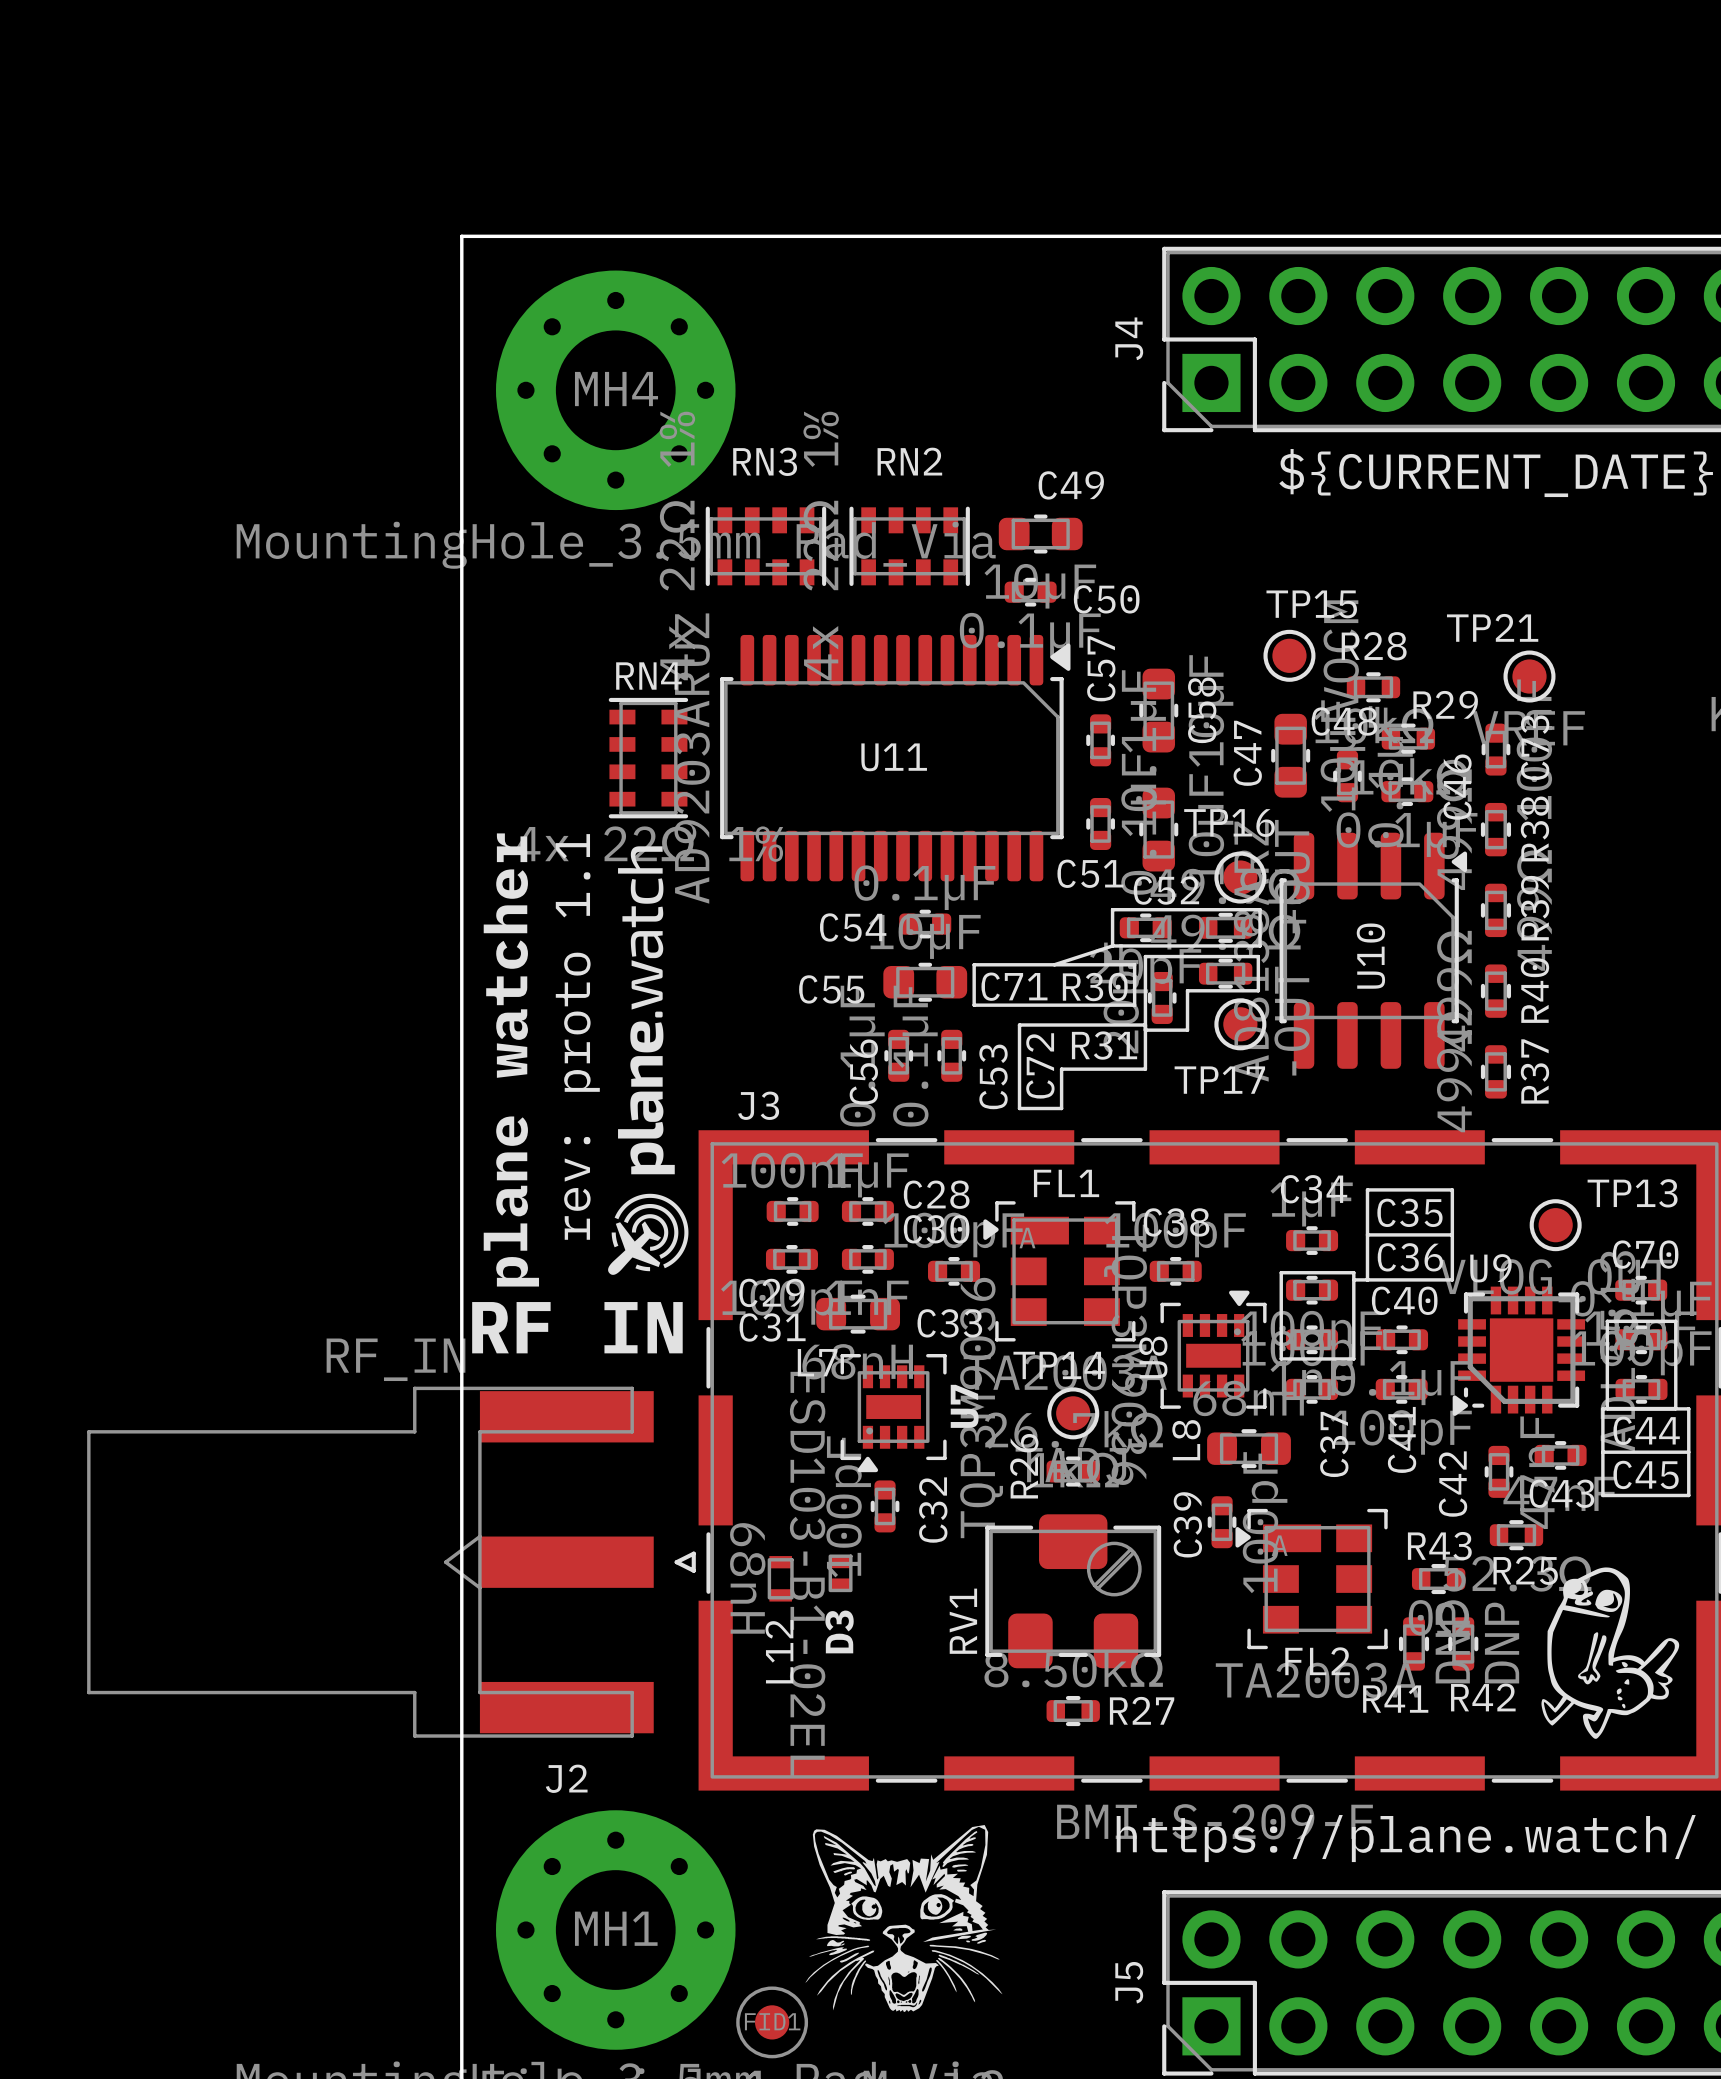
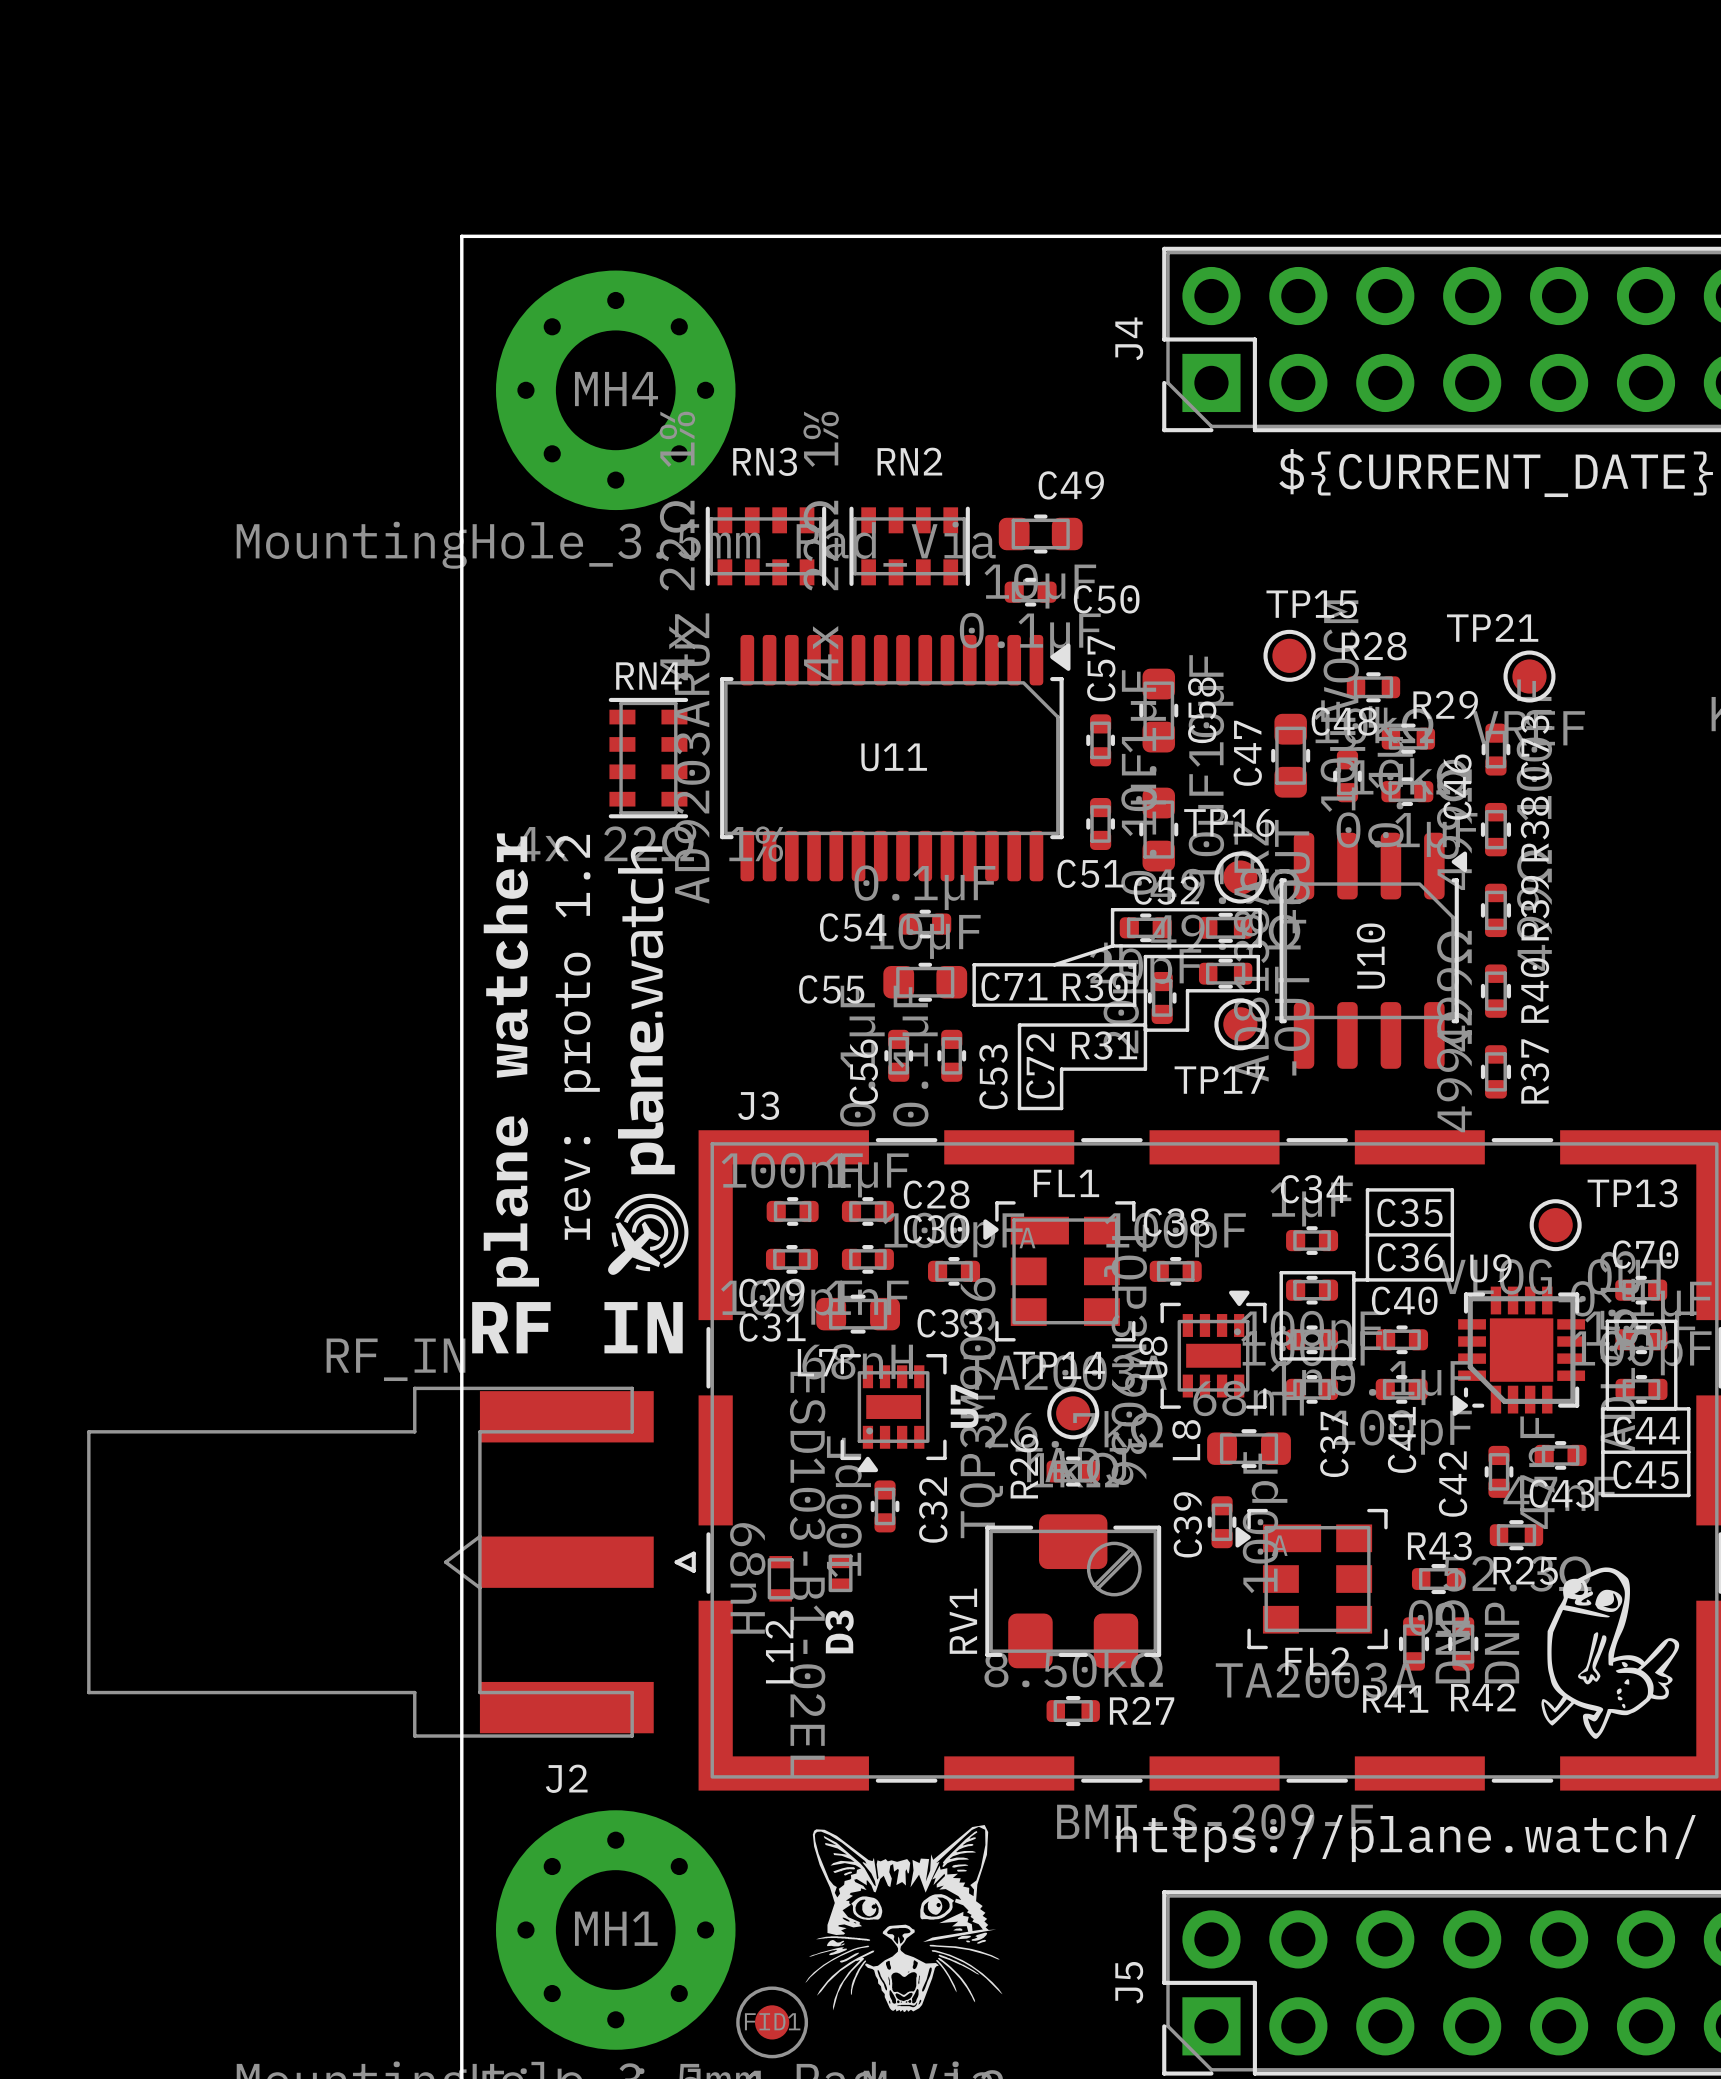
text: rev: proto 1.1 (577, 1036) -> rev: proto 1.2 (577, 1037)

